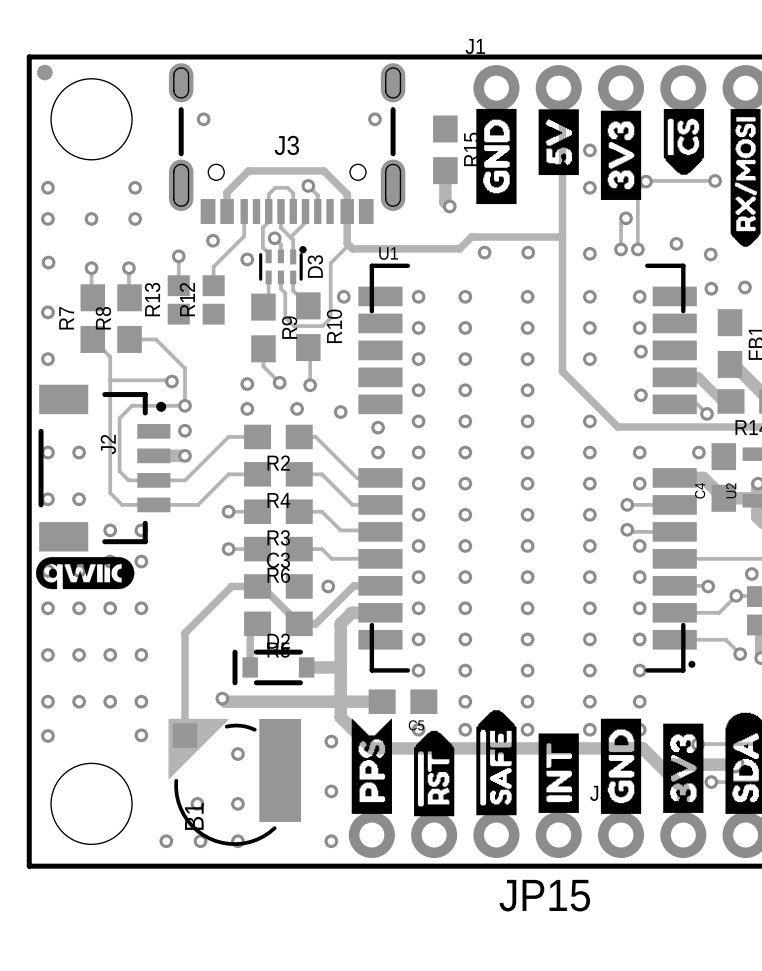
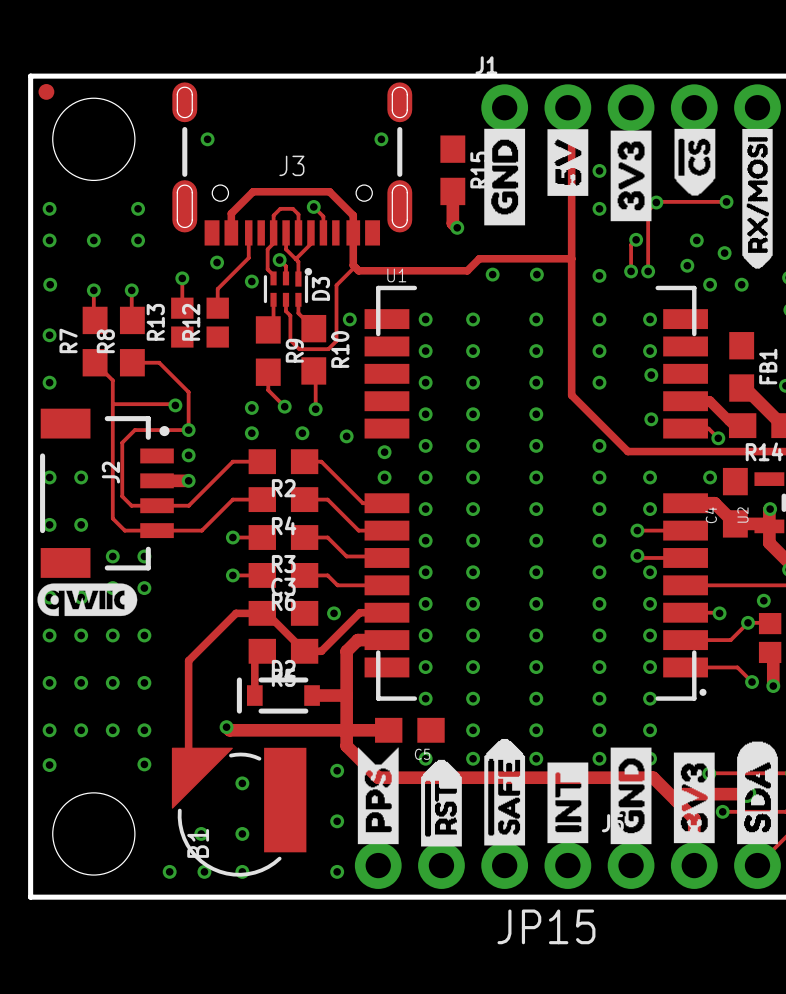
via: none -> (696, 240)
via: none -> (724, 253)
via position: (710, 254) -> (710, 284)
via: none -> (741, 284)
via: (744, 287) -> none
via: (711, 288) -> none

